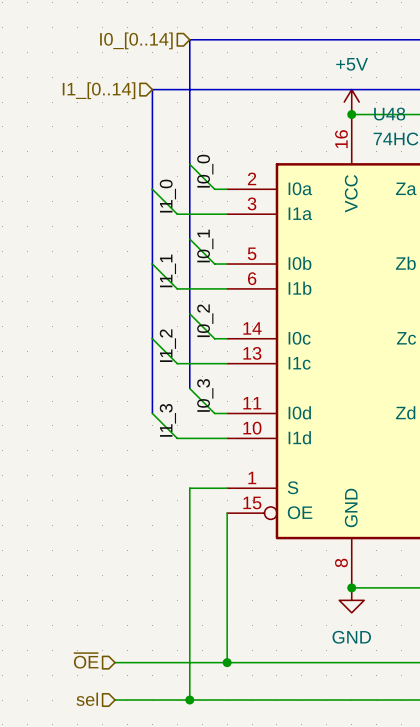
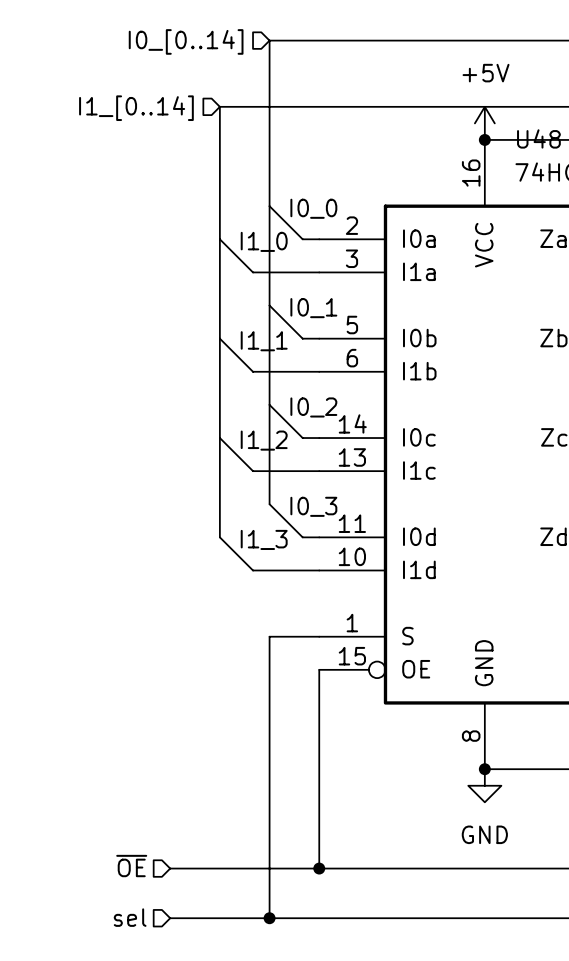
label rotation: 0° (205, 171) -> 90° clockwise (313, 208)
label rotation: 0° (167, 196) -> 90° clockwise (264, 241)
label rotation: 0° (205, 246) -> 90° clockwise (313, 308)
label rotation: 0° (168, 270) -> 90° clockwise (264, 341)
label rotation: 0° (205, 320) -> 90° clockwise (313, 407)
label rotation: 0° (167, 345) -> 90° clockwise (264, 440)
label rotation: 0° (205, 395) -> 90° clockwise (313, 506)
label rotation: 0° (167, 420) -> 90° clockwise (264, 539)

